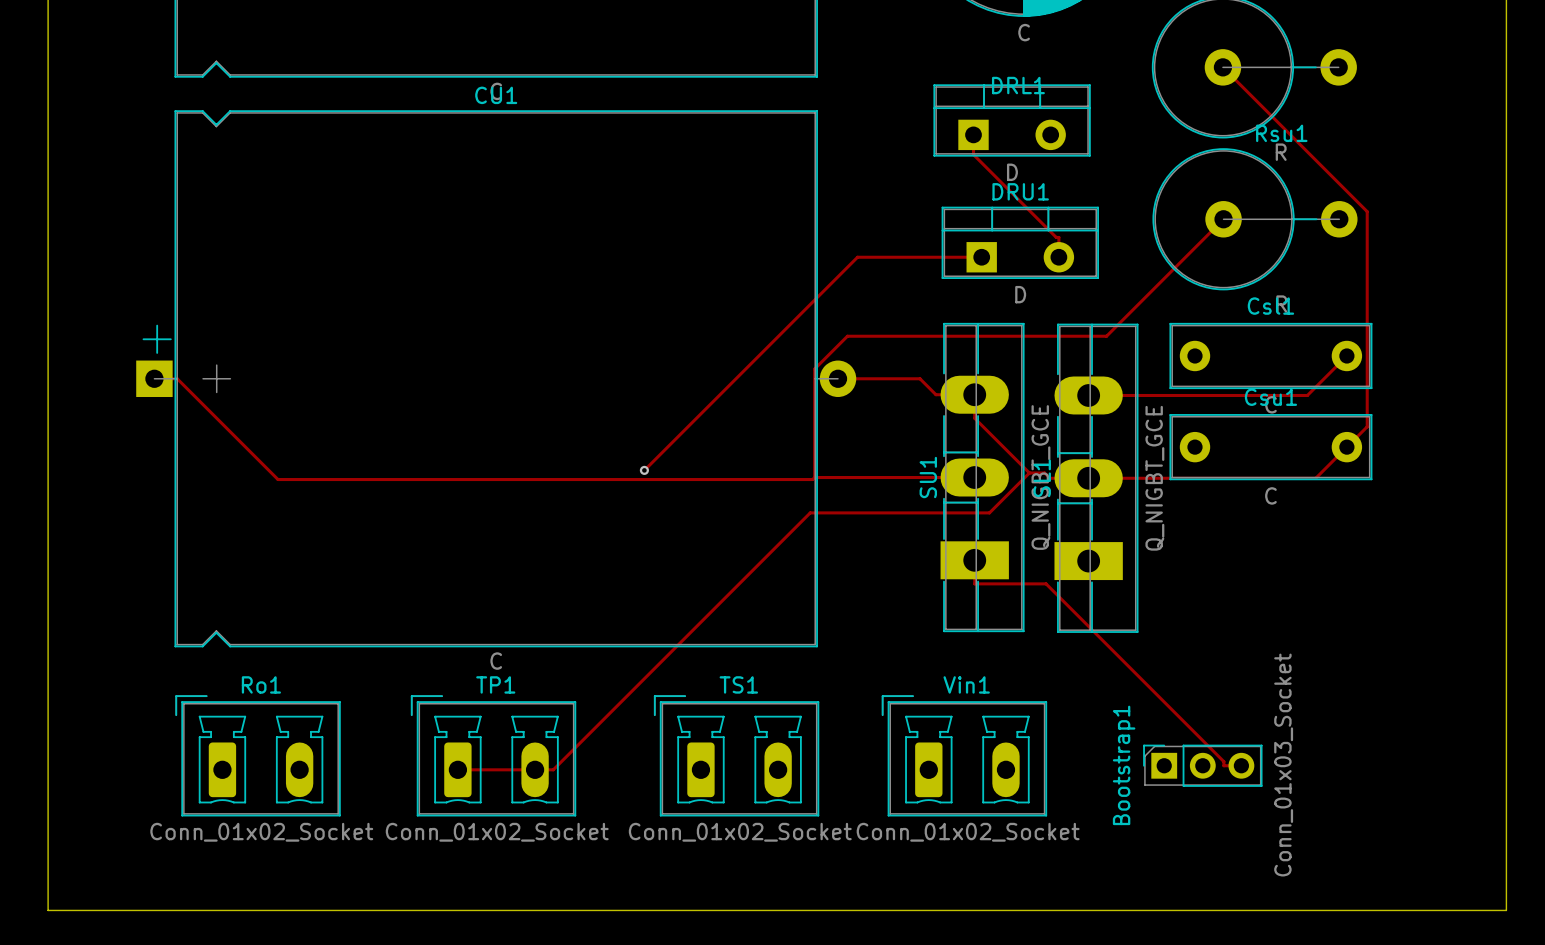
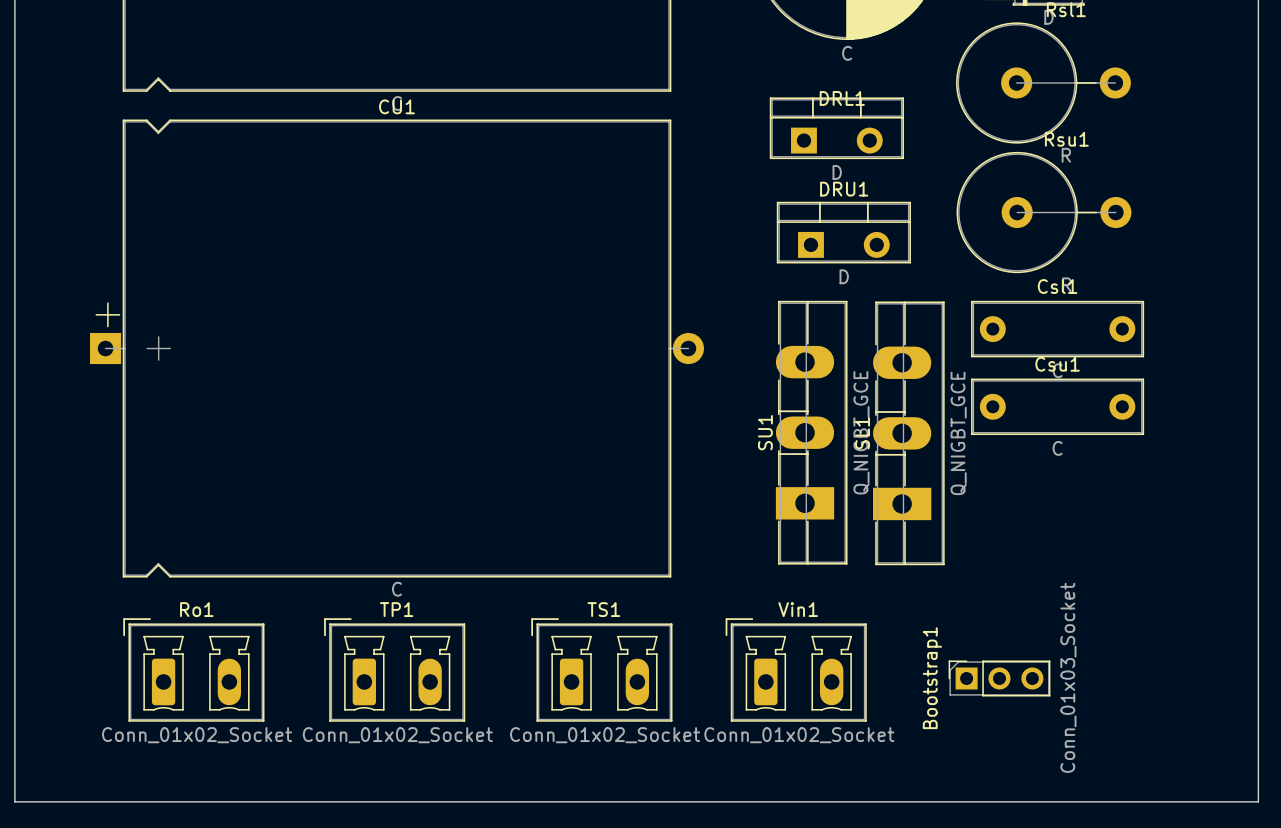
track: (1222, 67) (1367, 211) (1367, 426) (1315, 478) (1049, 478) (1044, 472) (1029, 472) -> none
track: (973, 134) (973, 154) (1056, 237) (1058, 237) (1058, 257) -> none
track: (1223, 219) (1106, 336) (847, 336) (814, 369) (814, 477) -> none
track: (981, 257) (857, 257) (644, 470) -> none
track: (1346, 355) (1307, 395) (1088, 395) -> none
track: (154, 378) (177, 378) (278, 479) (812, 479) (814, 477) -> none
track: (838, 378) (920, 378) (935, 394) (974, 394) (974, 418) (1029, 472) -> none
via: (644, 470) -> none
track: (1029, 472) (989, 512) (810, 512) (553, 769) (457, 769) -> none
track: (814, 477) (974, 477) -> none
track: (974, 560) (974, 583) (1046, 583) (1223, 761) (1223, 765) (1241, 765) -> none

